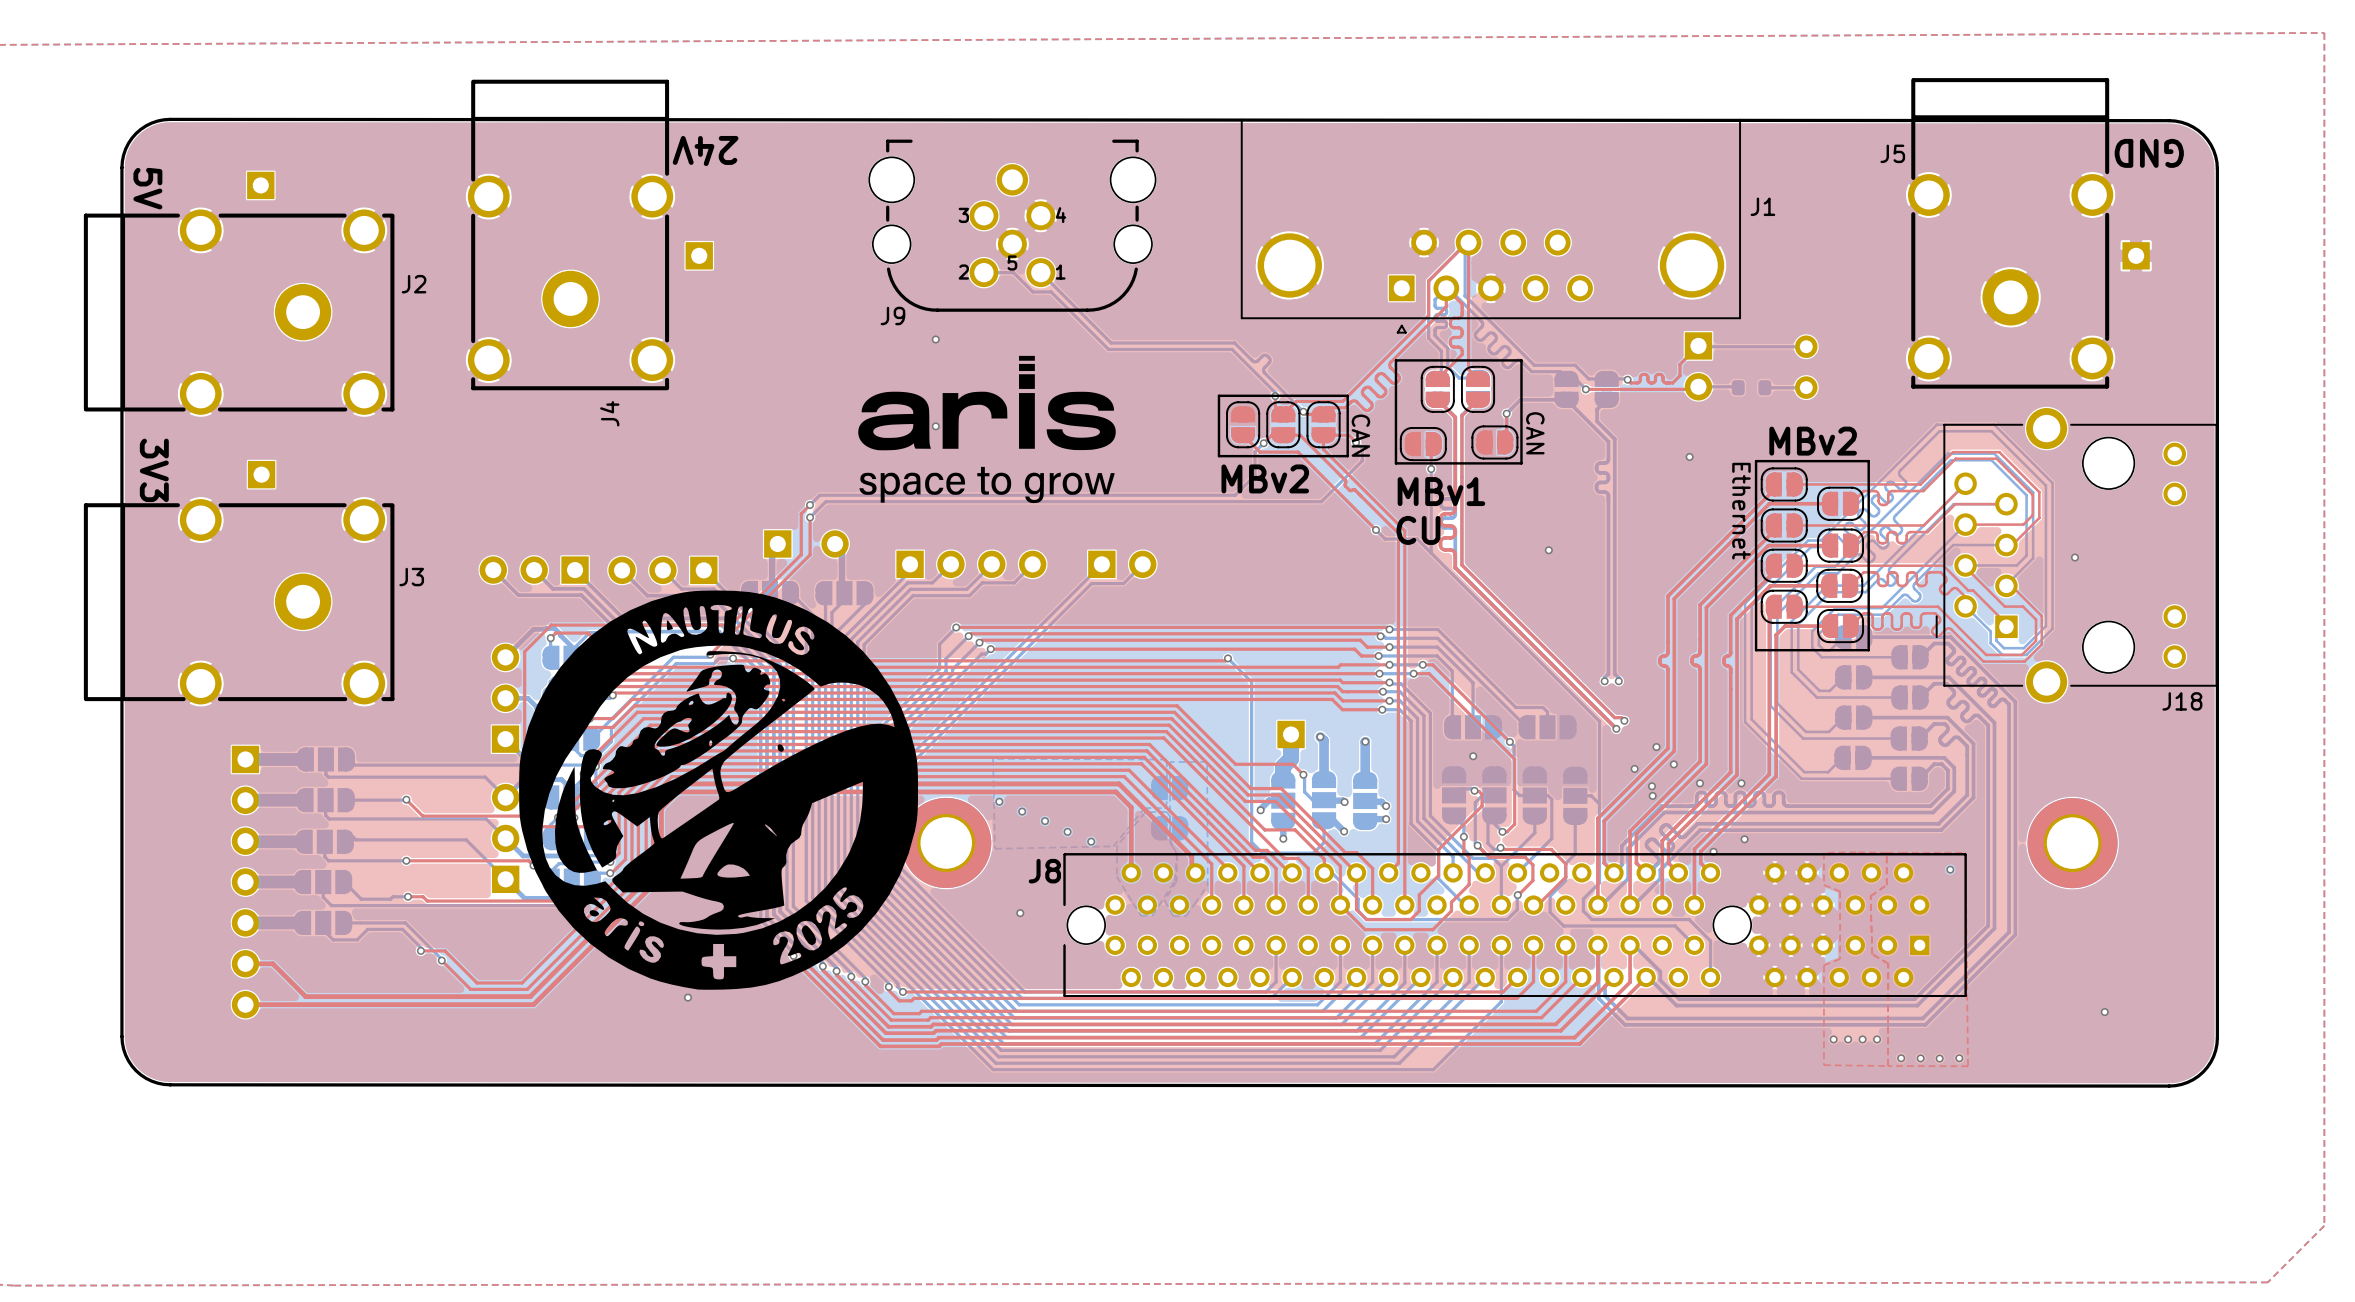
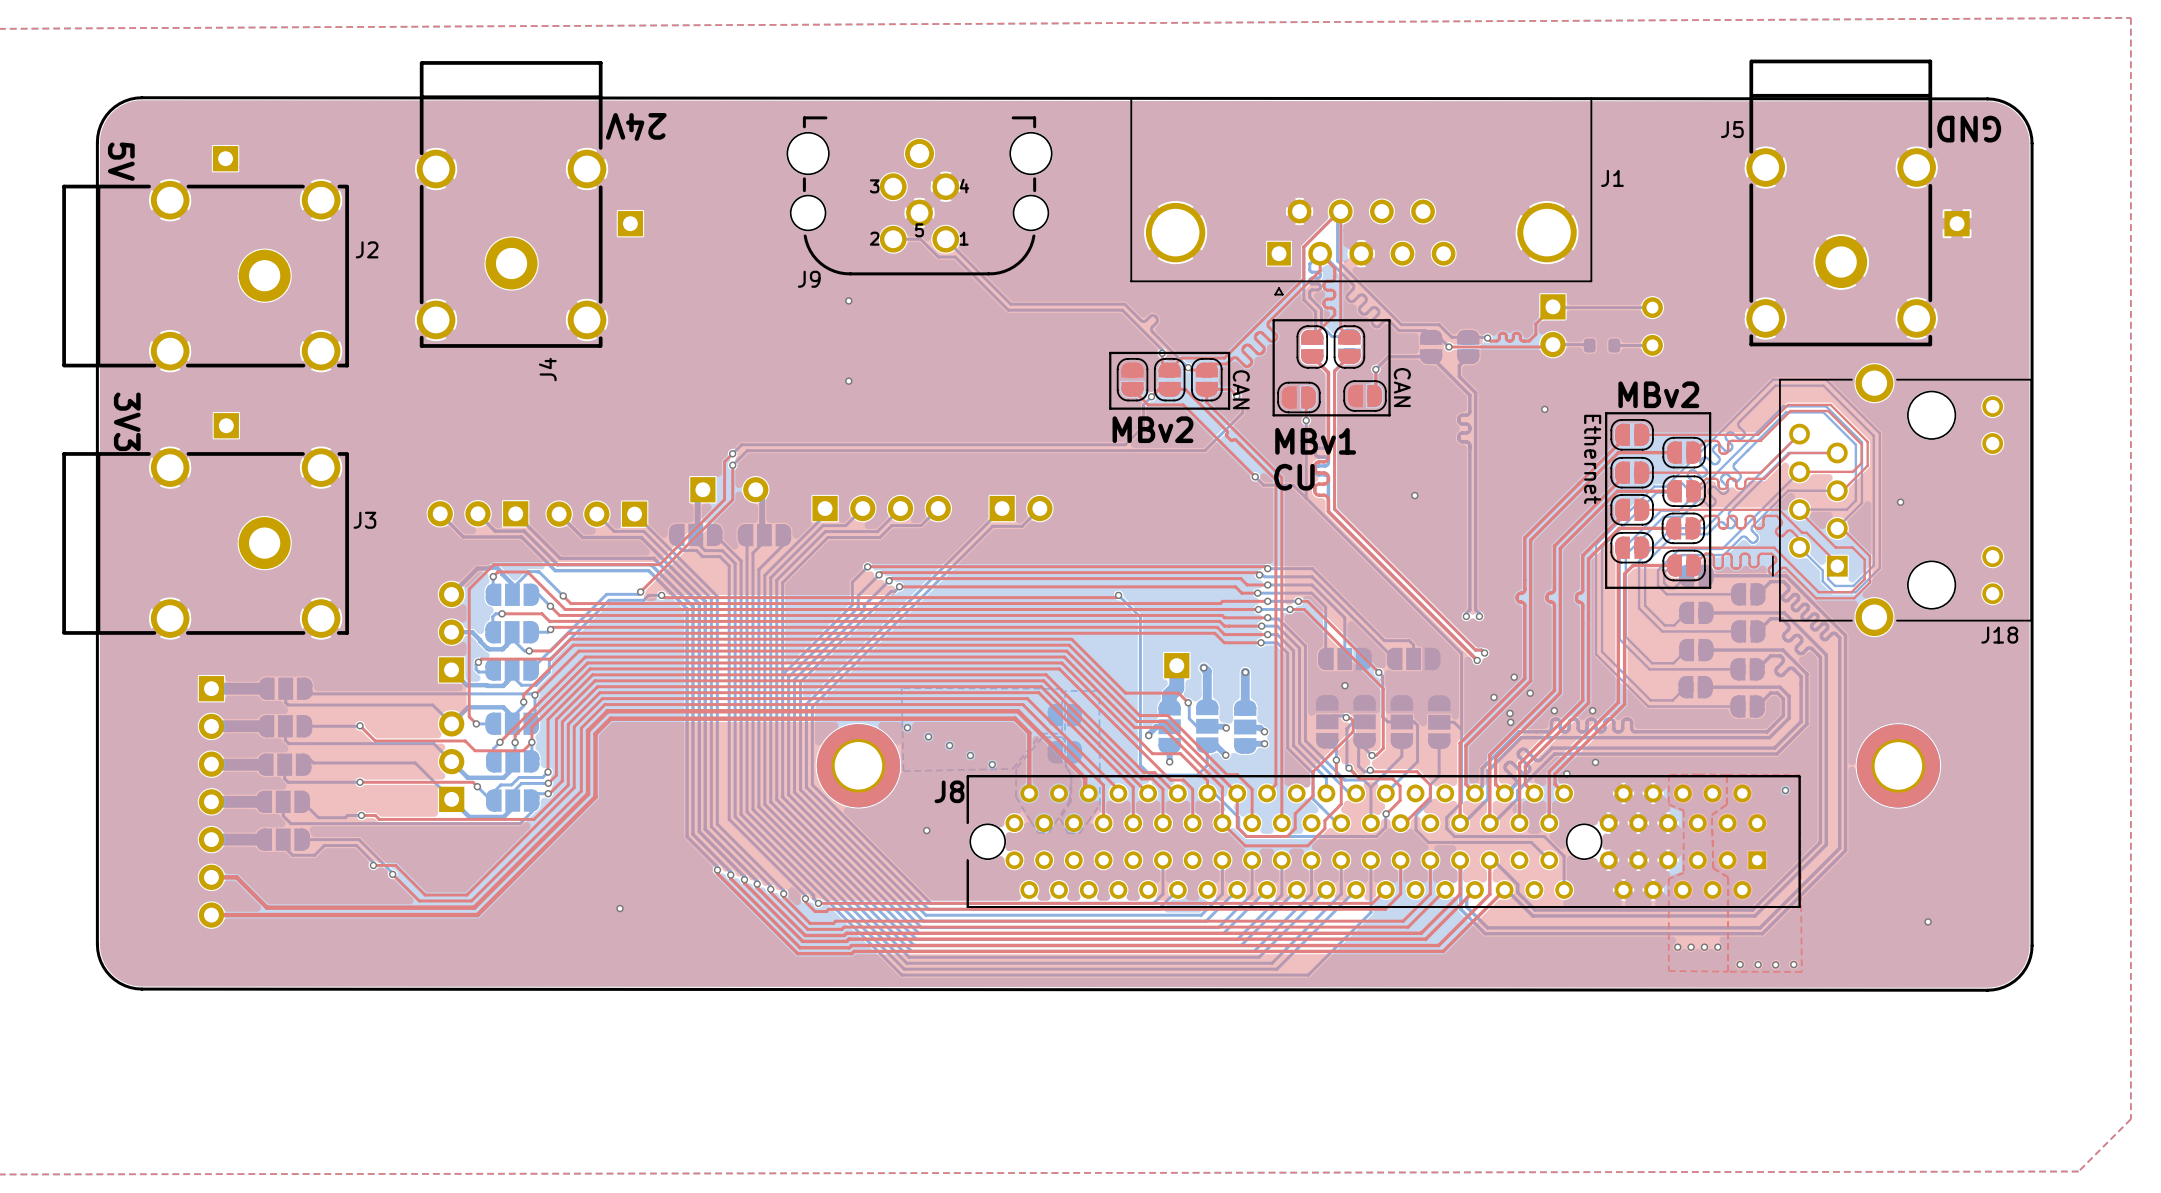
drawing: [858, 355, 1116, 504] -> none
drawing: [519, 590, 919, 990] -> none

